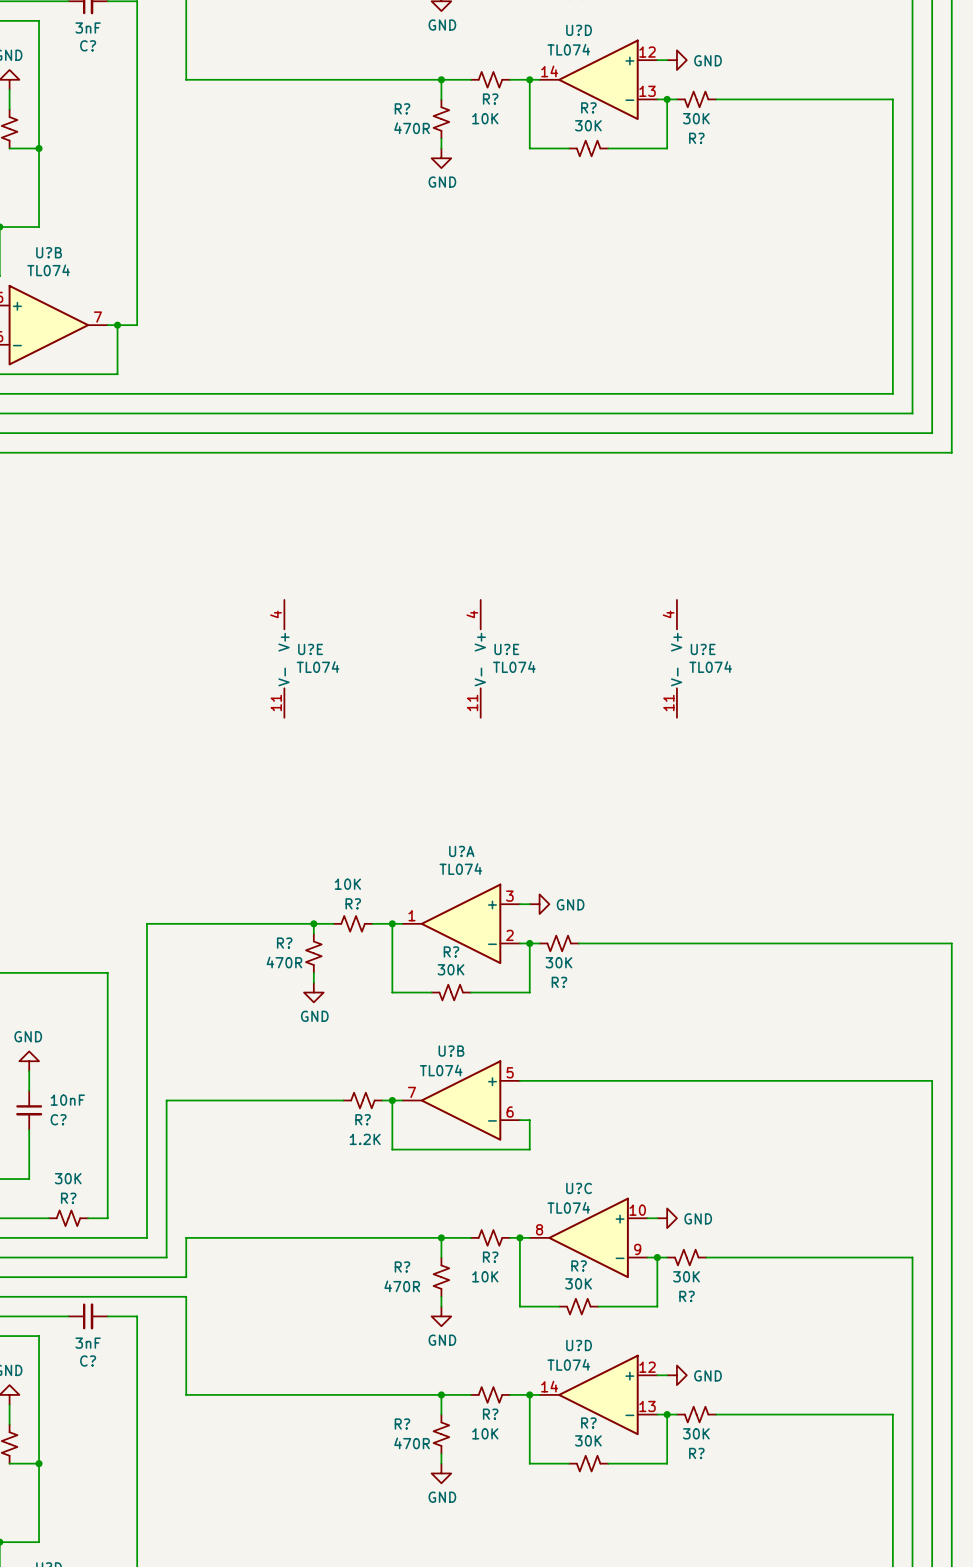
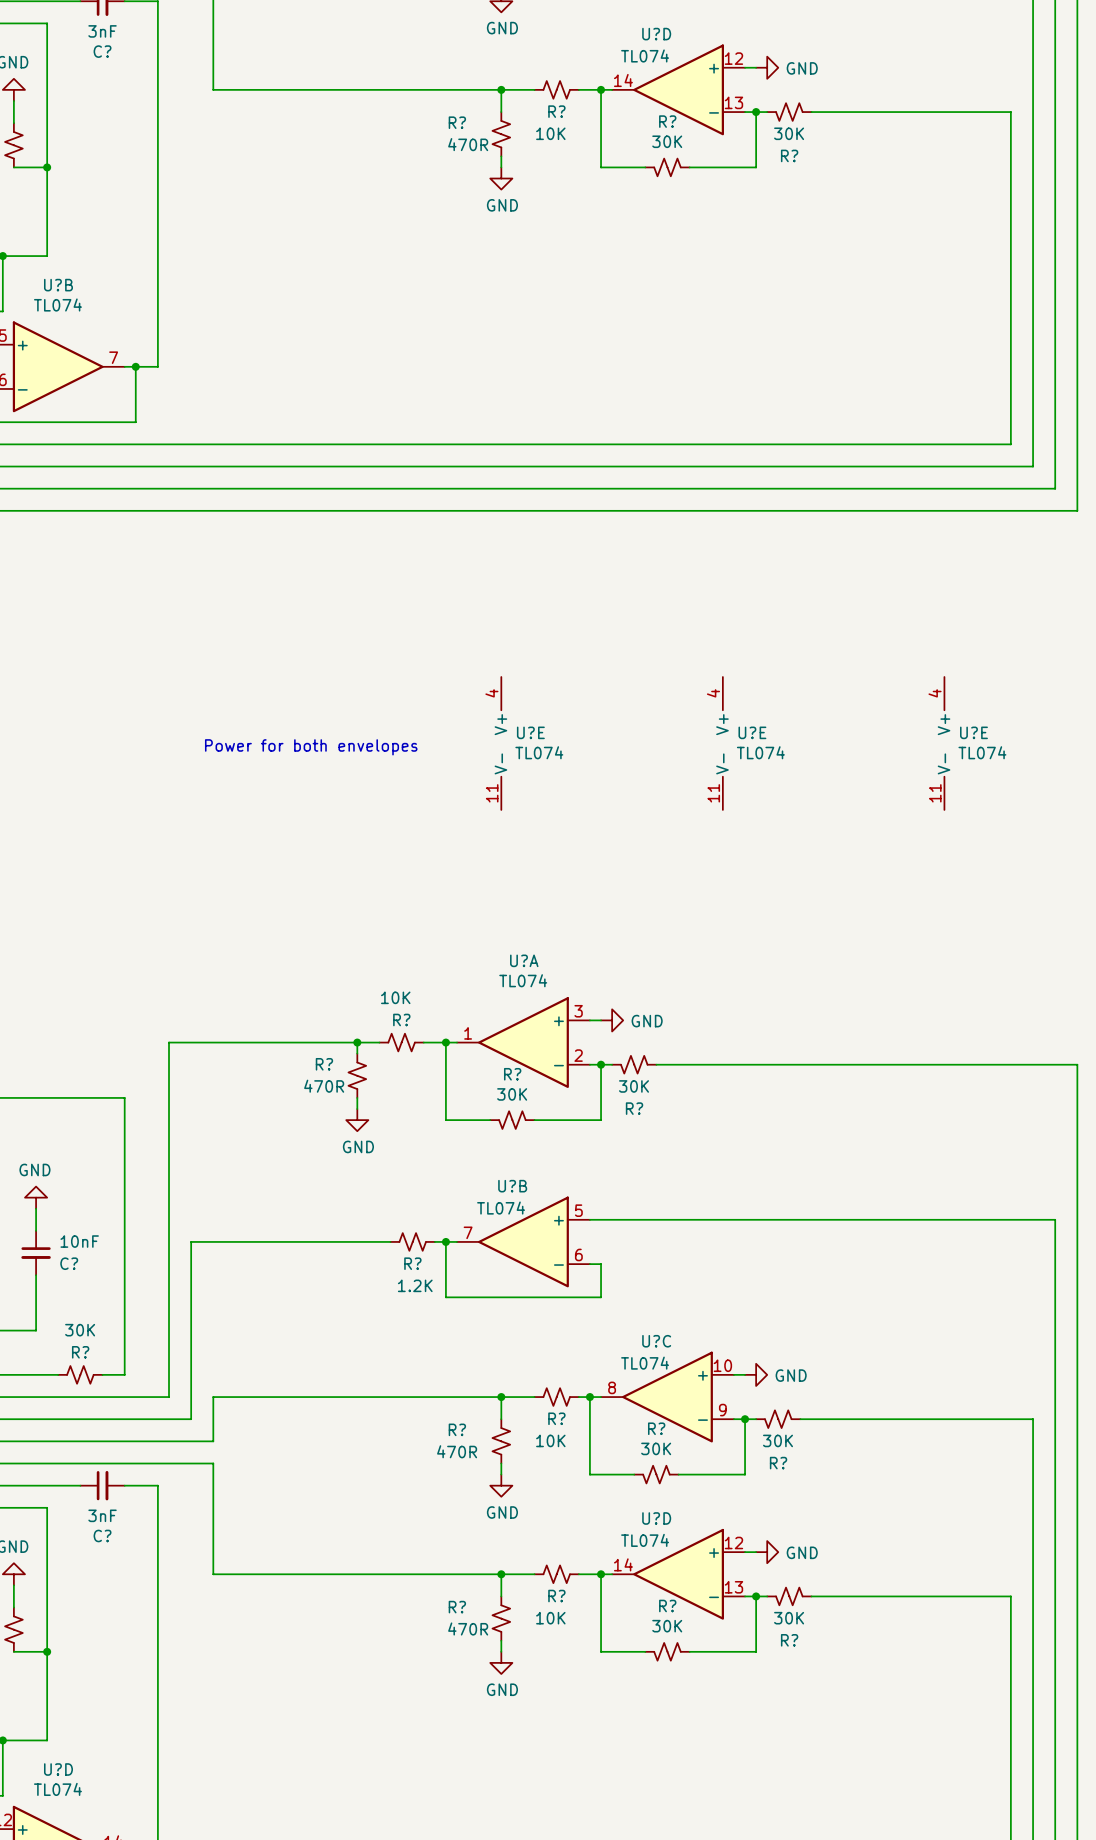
U?E: TL074 (284, 658) -> none
U?E position: (480, 658) -> (501, 743)
U?E position: (676, 658) -> (722, 743)
U?E: none -> TL074 (944, 743)
text: none -> Power for both envelopes (311, 747)

